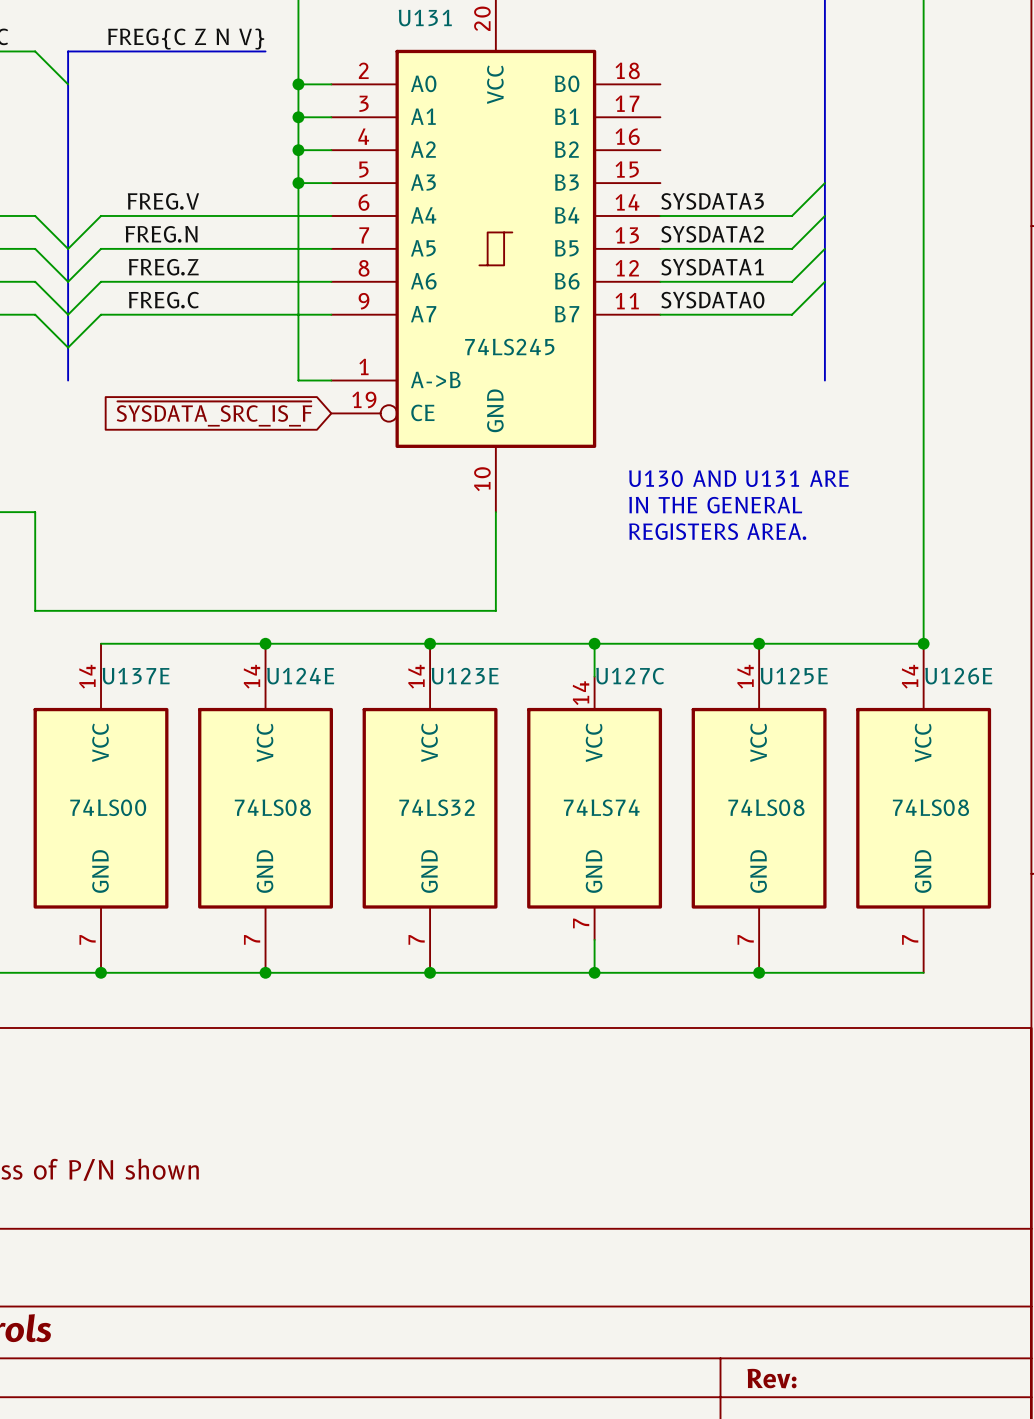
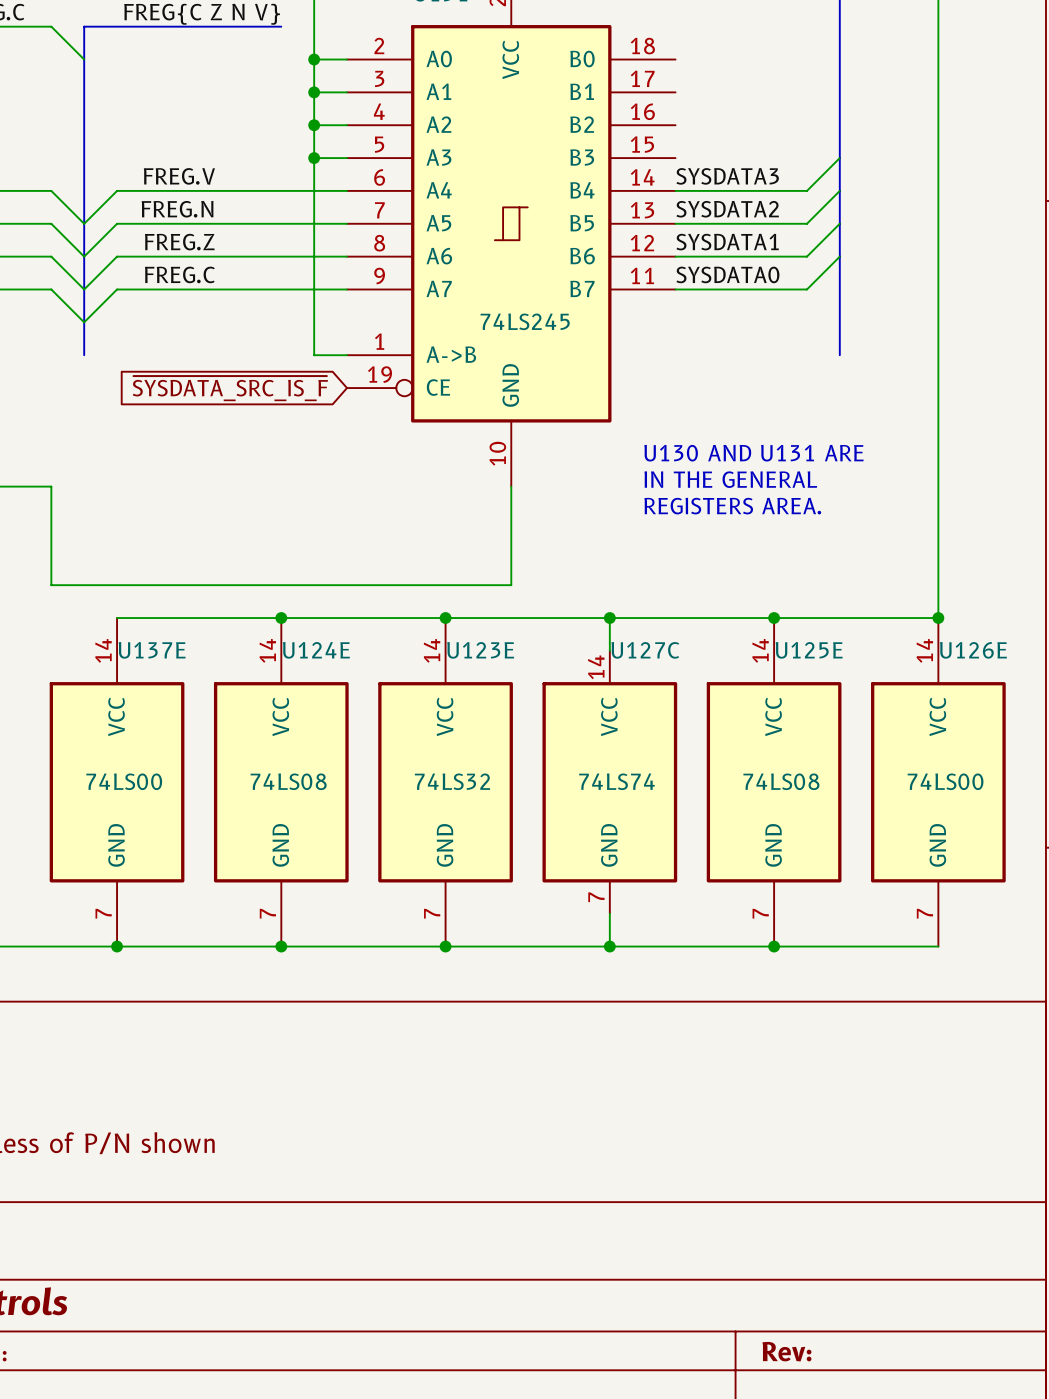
U126E value: 74LS08 (930, 807) -> 74LS00 (945, 781)

